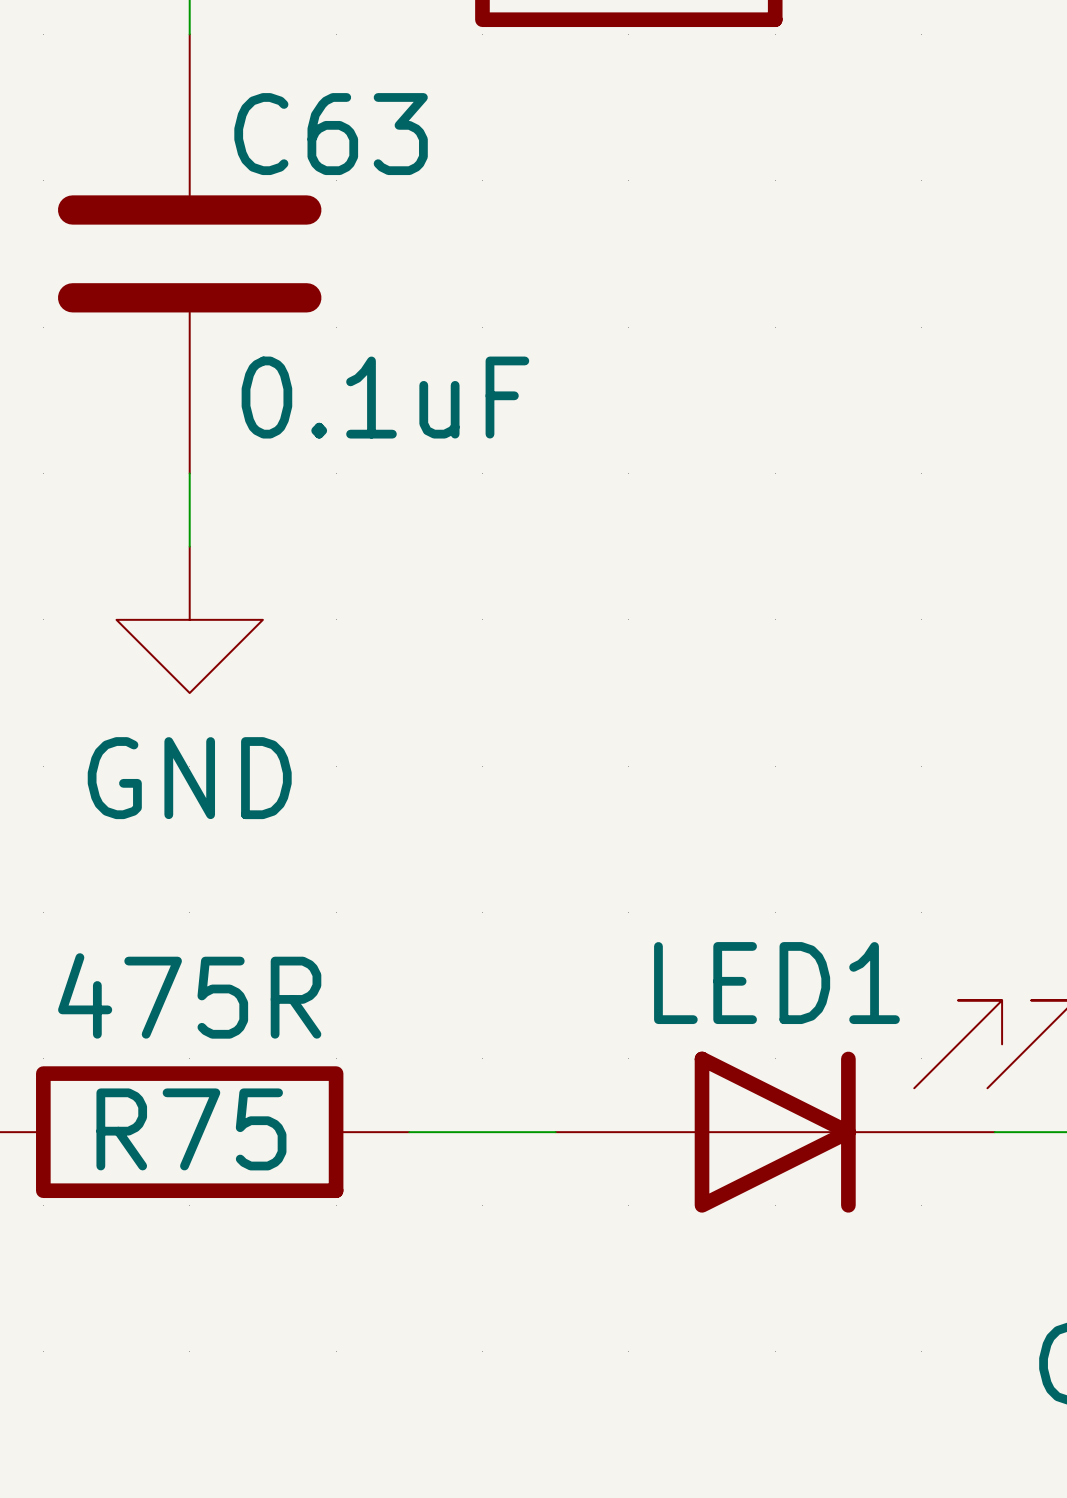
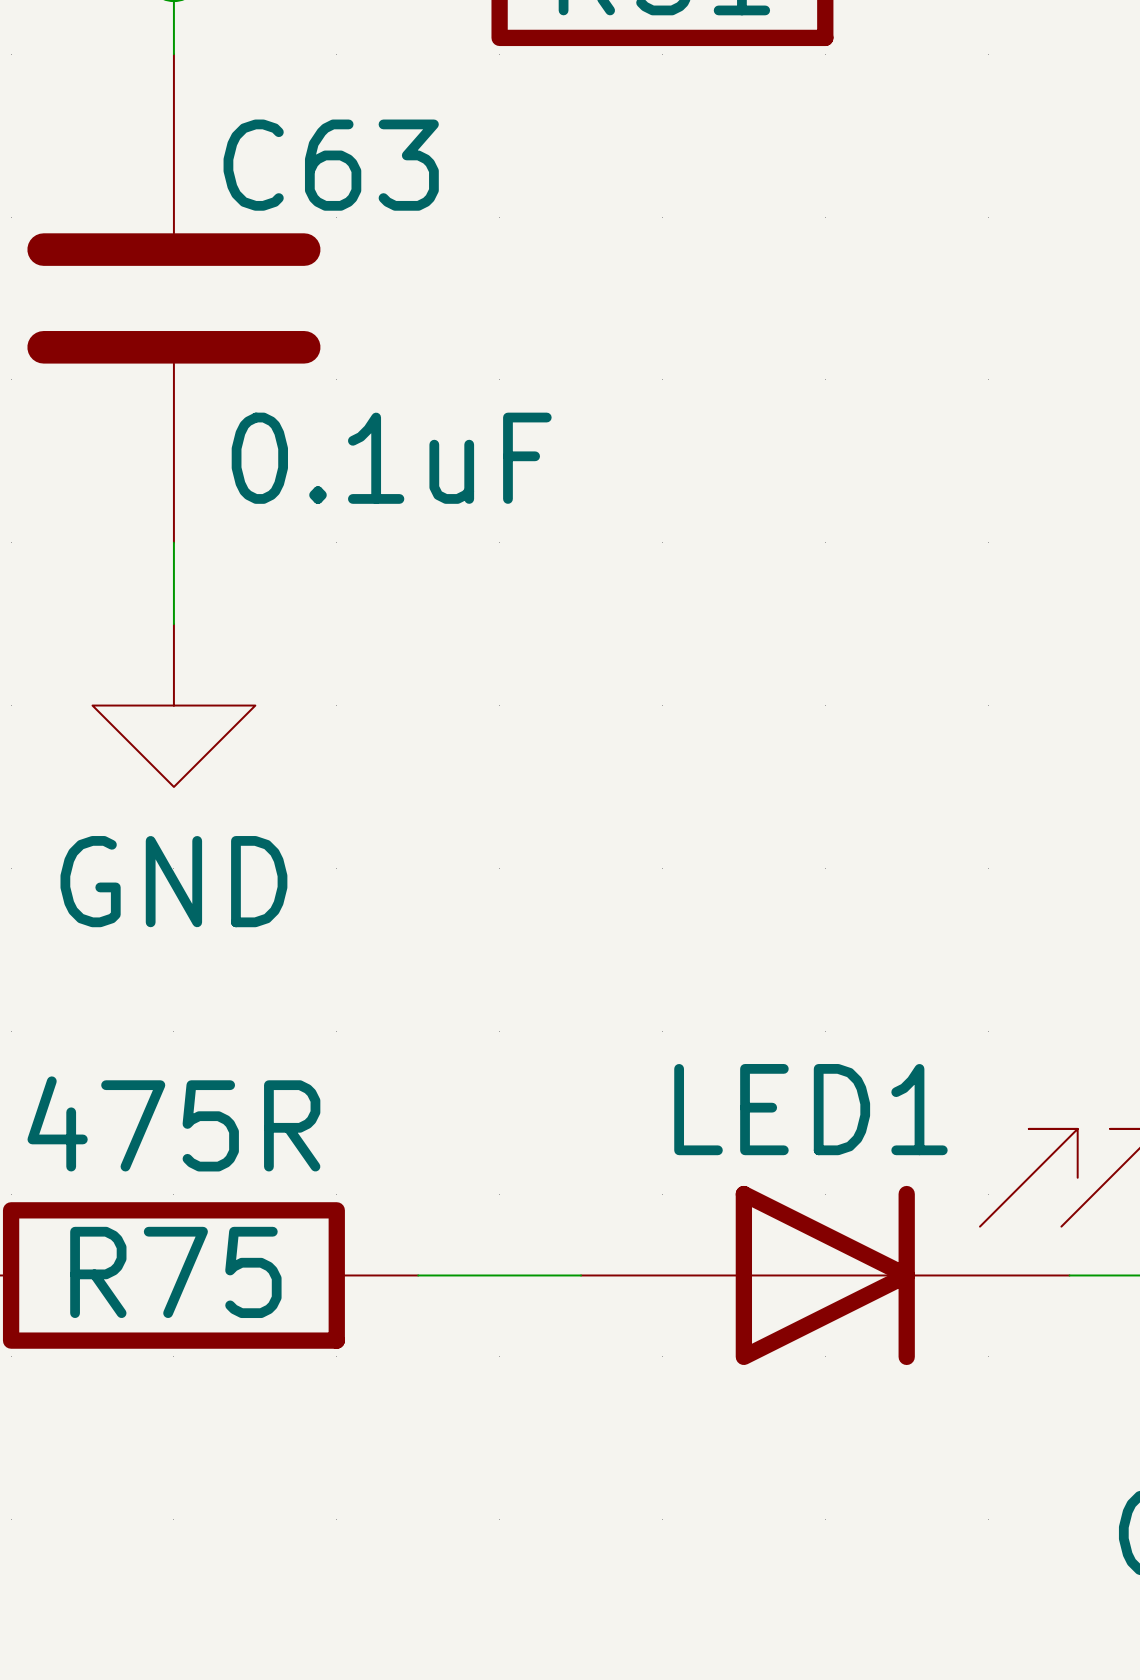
LED1 name position: LED1 (776, 983) -> LED1 (810, 1109)

